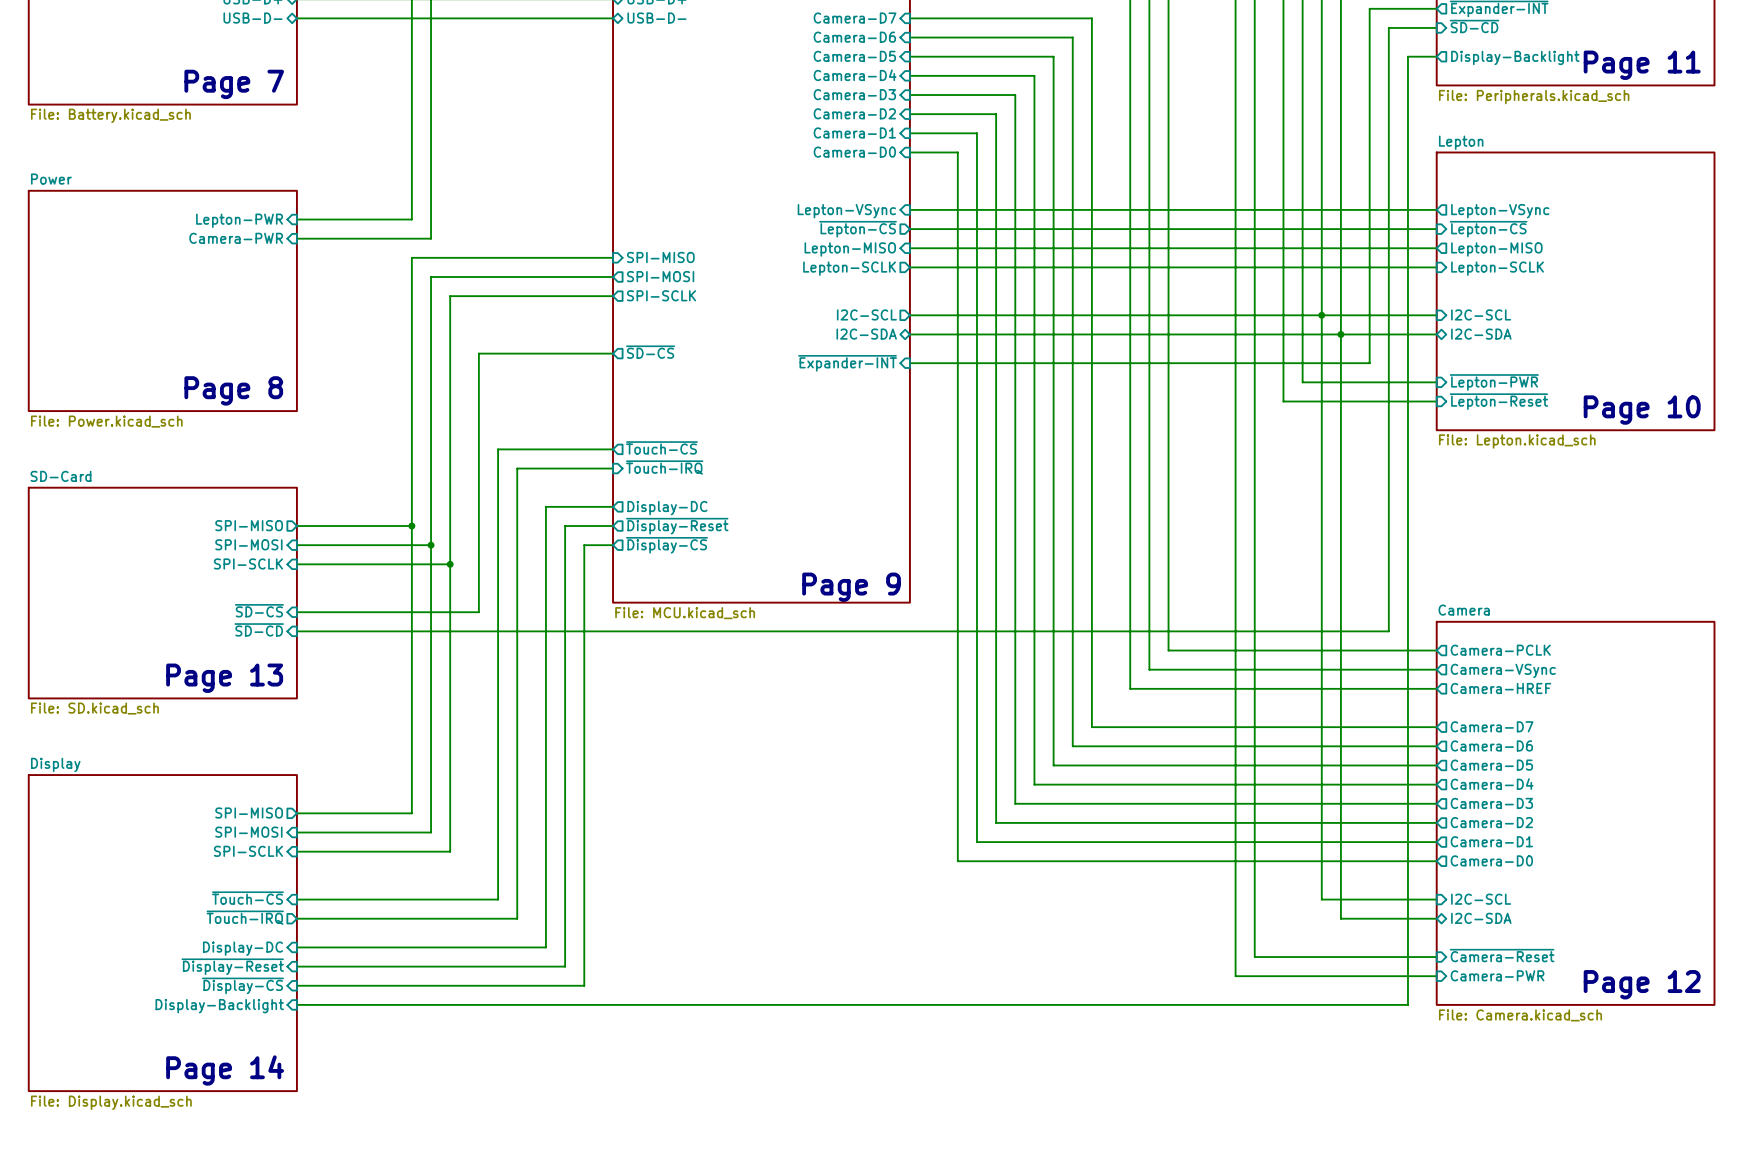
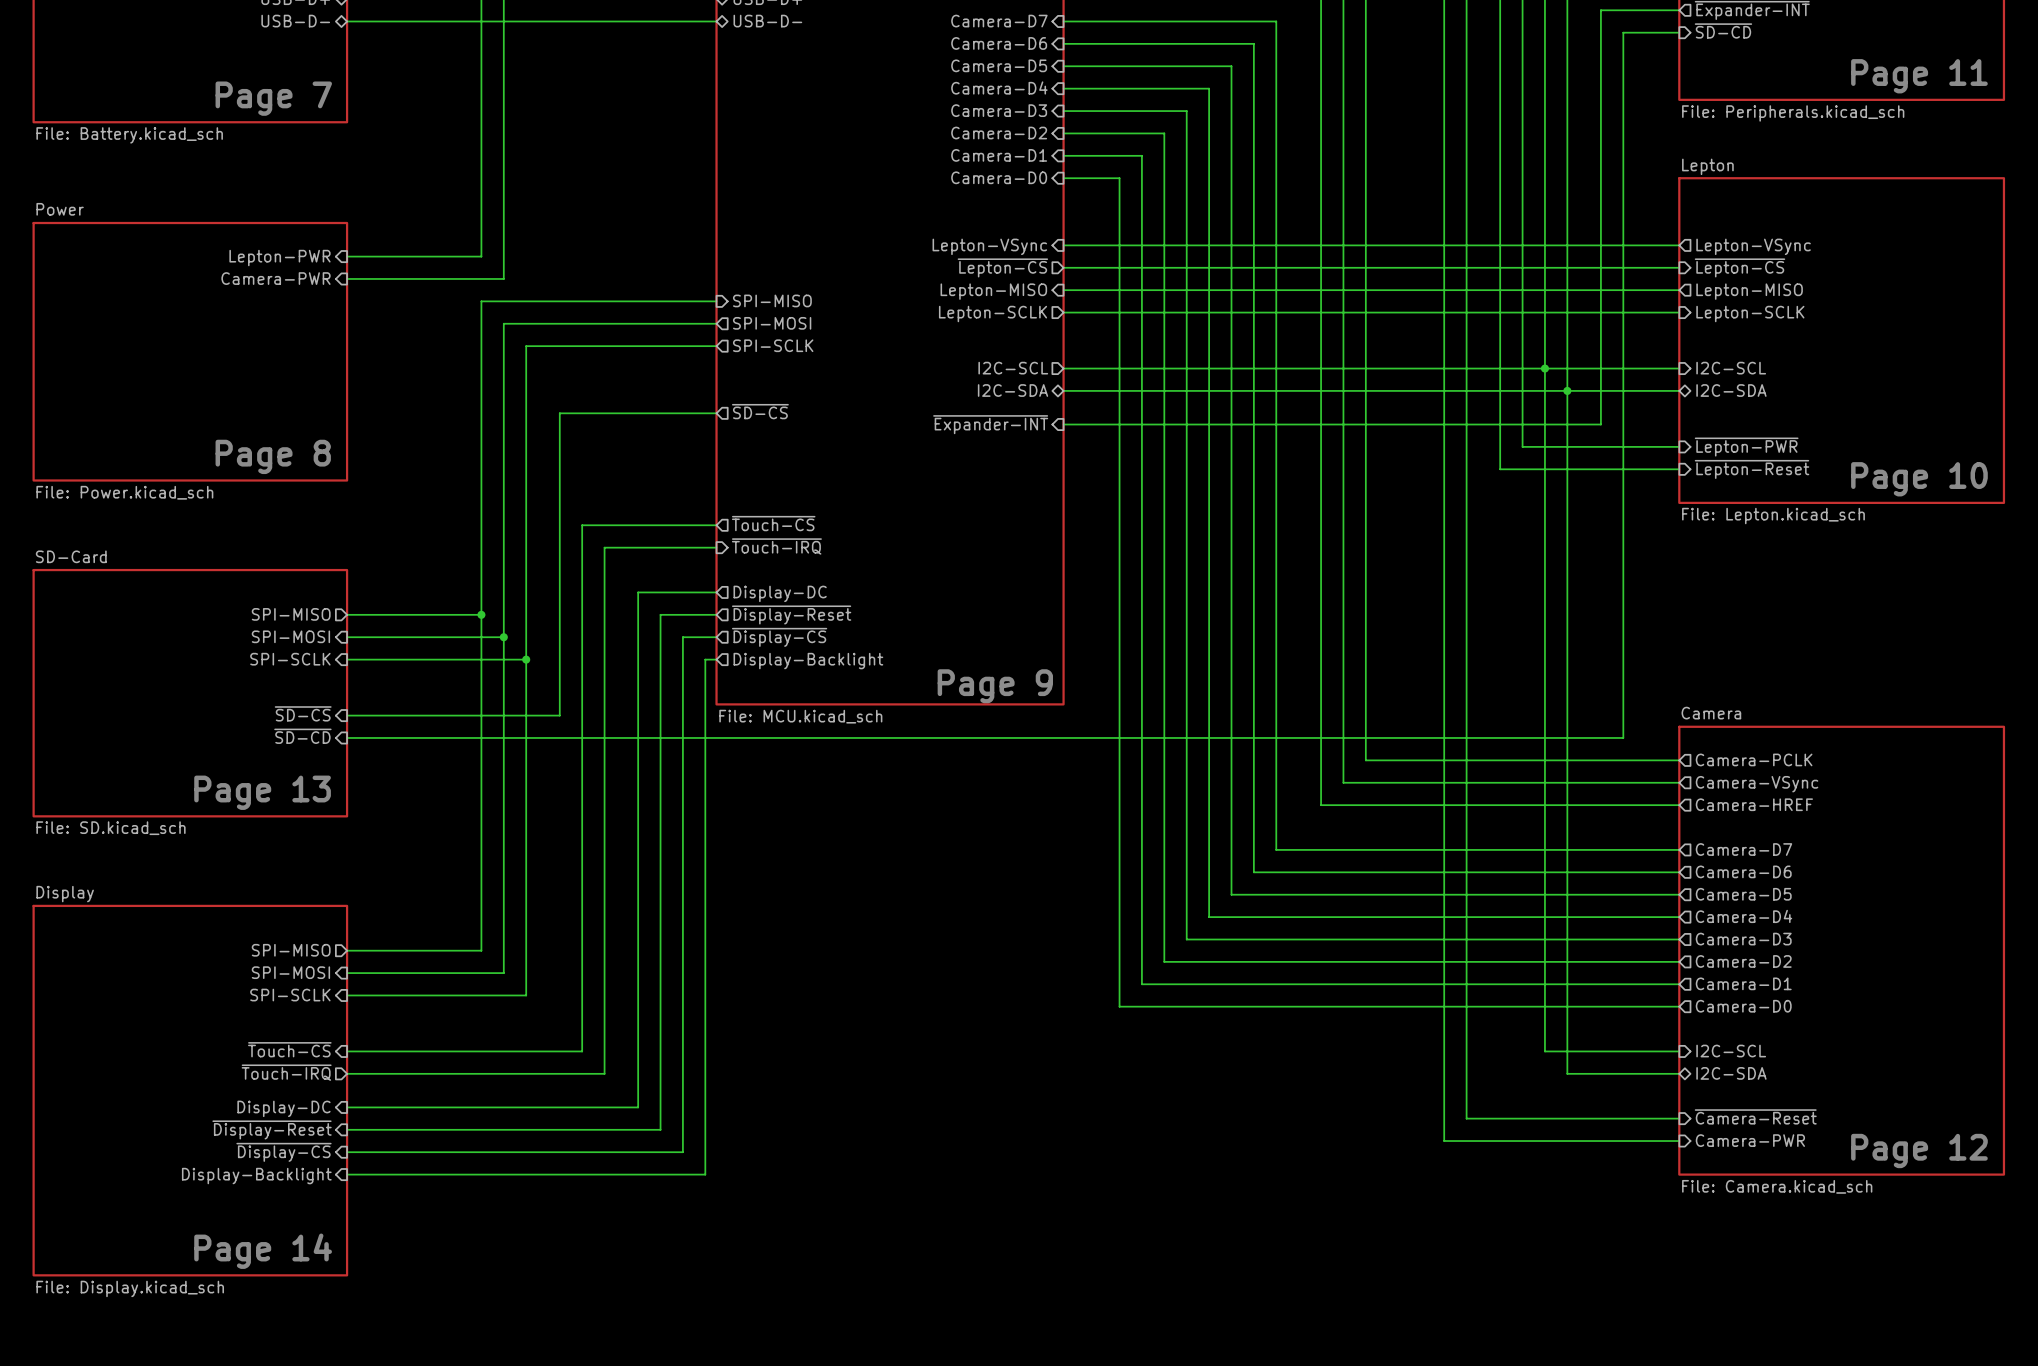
wire: (1436, 56) (1407, 56) (1407, 1004) (603, 1004) -> (716, 659) (705, 659) (705, 1174)
sheet pin: Display-Backlight (1515, 57) -> none
sheet pin: none -> Display-Backlight (808, 661)

